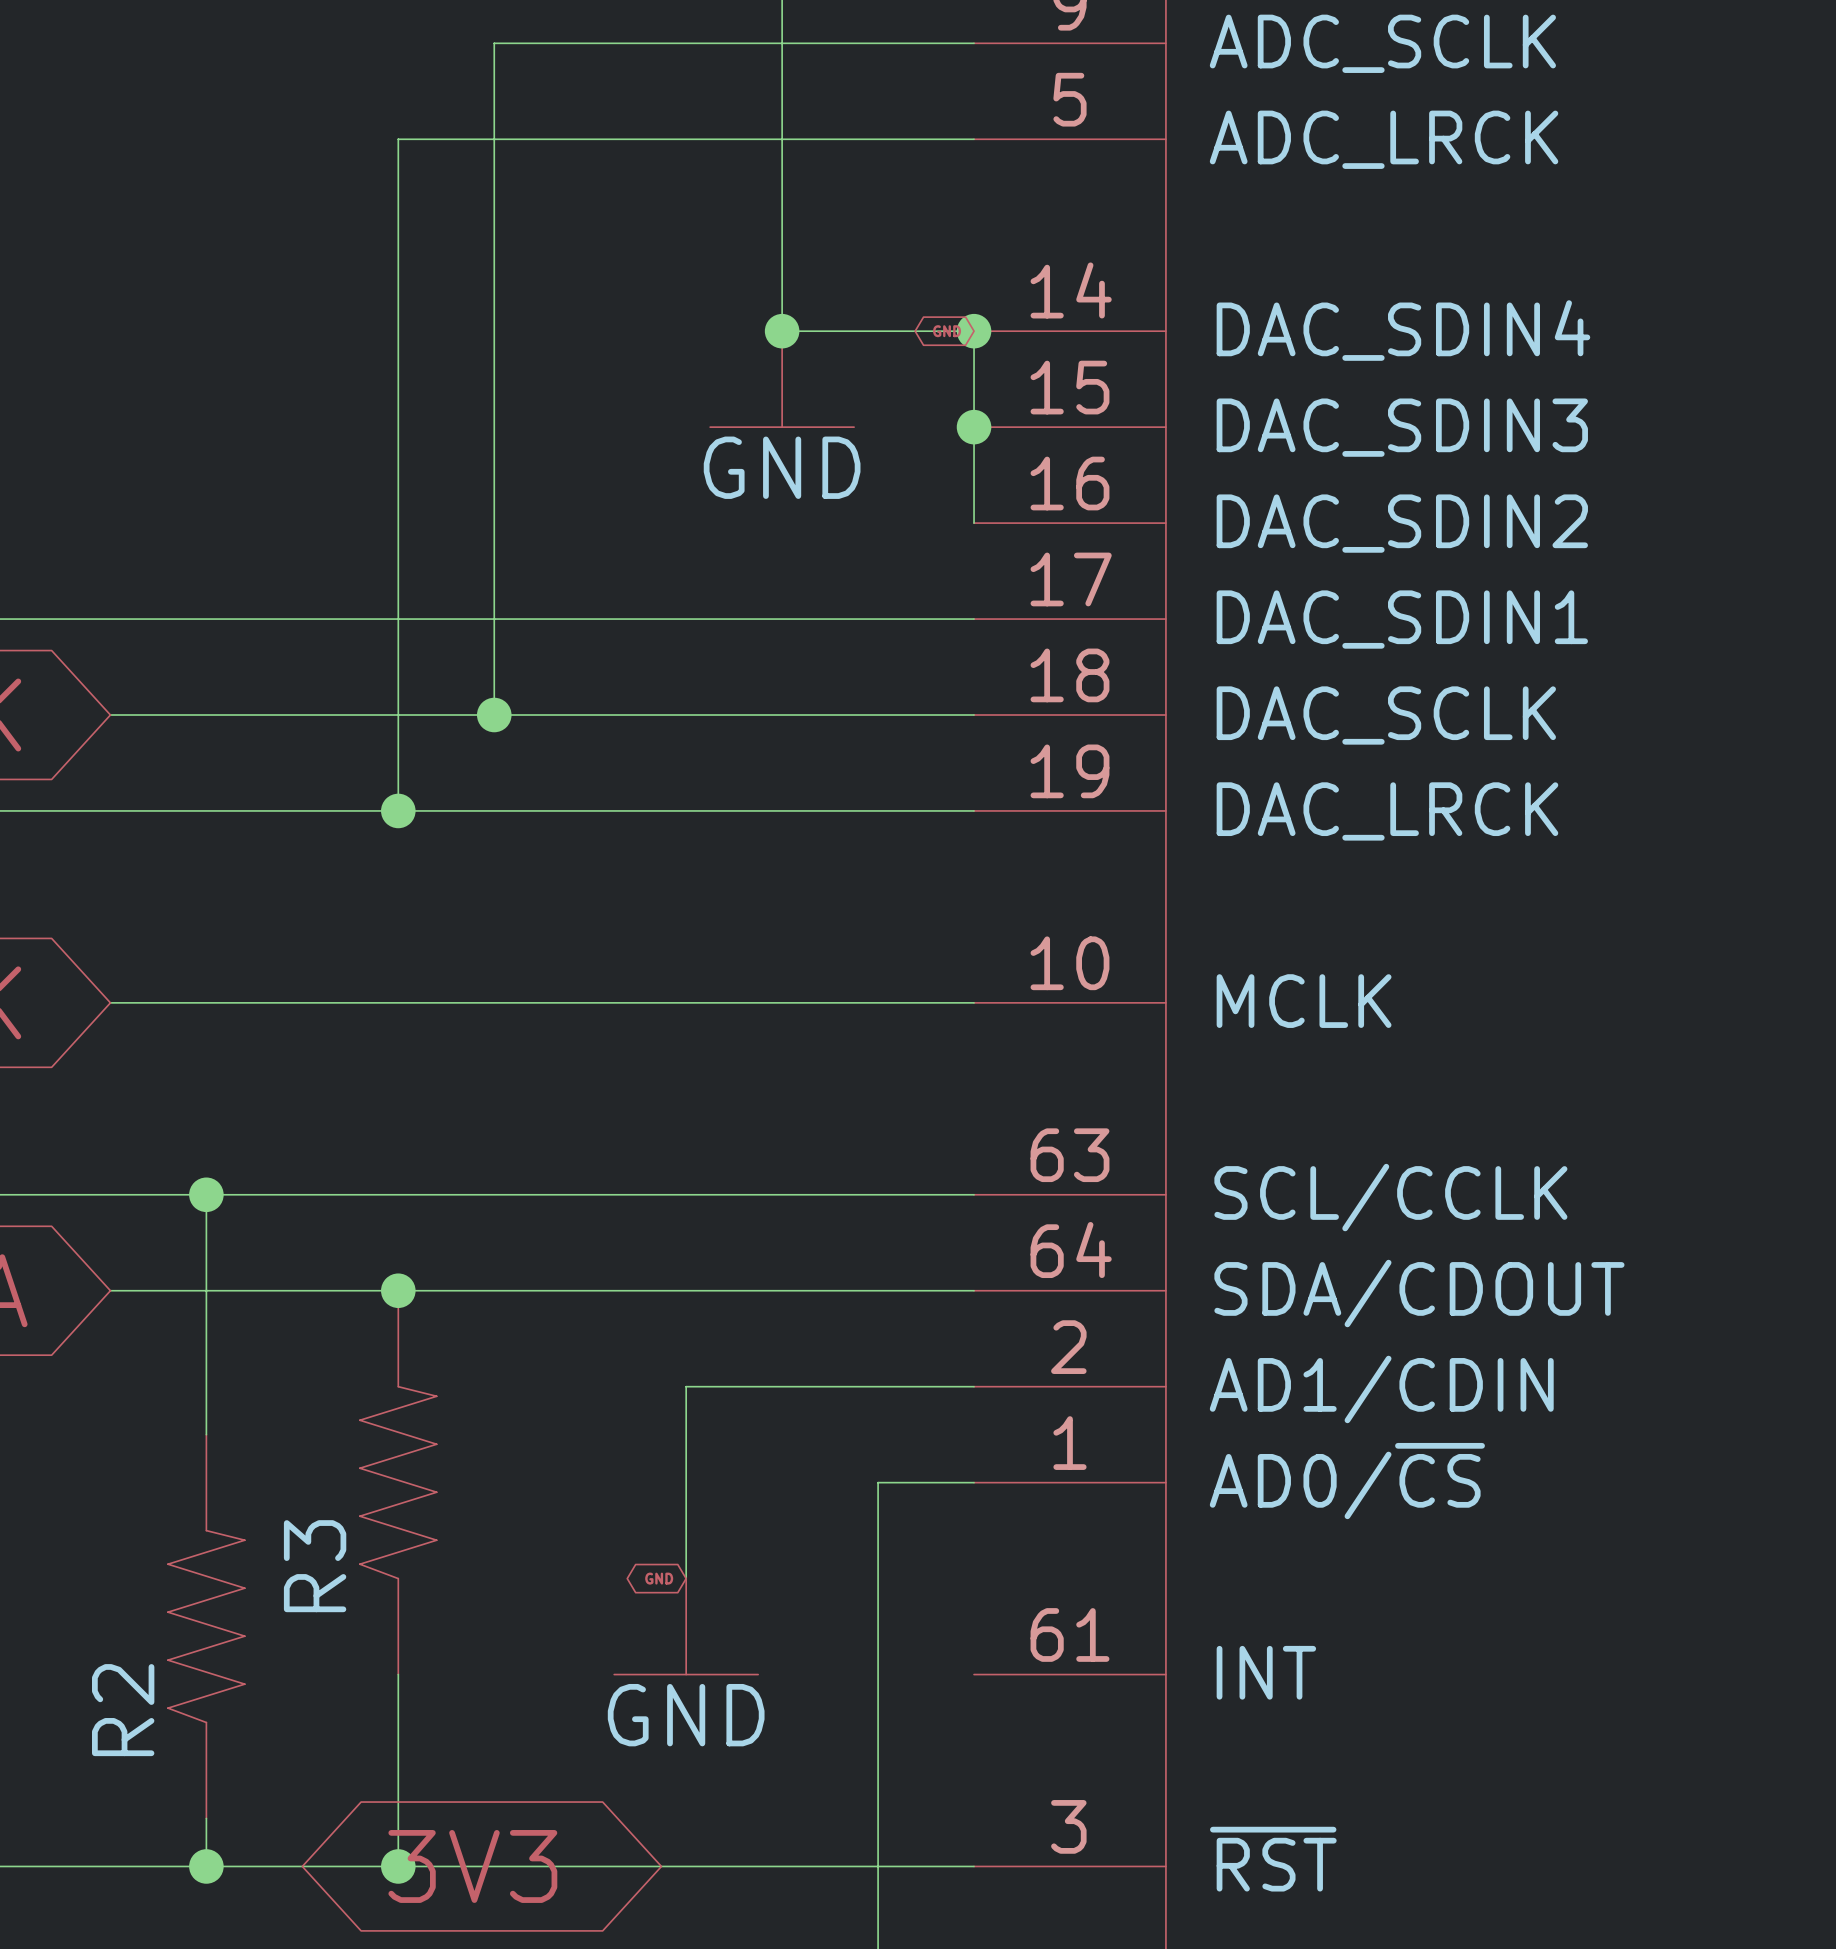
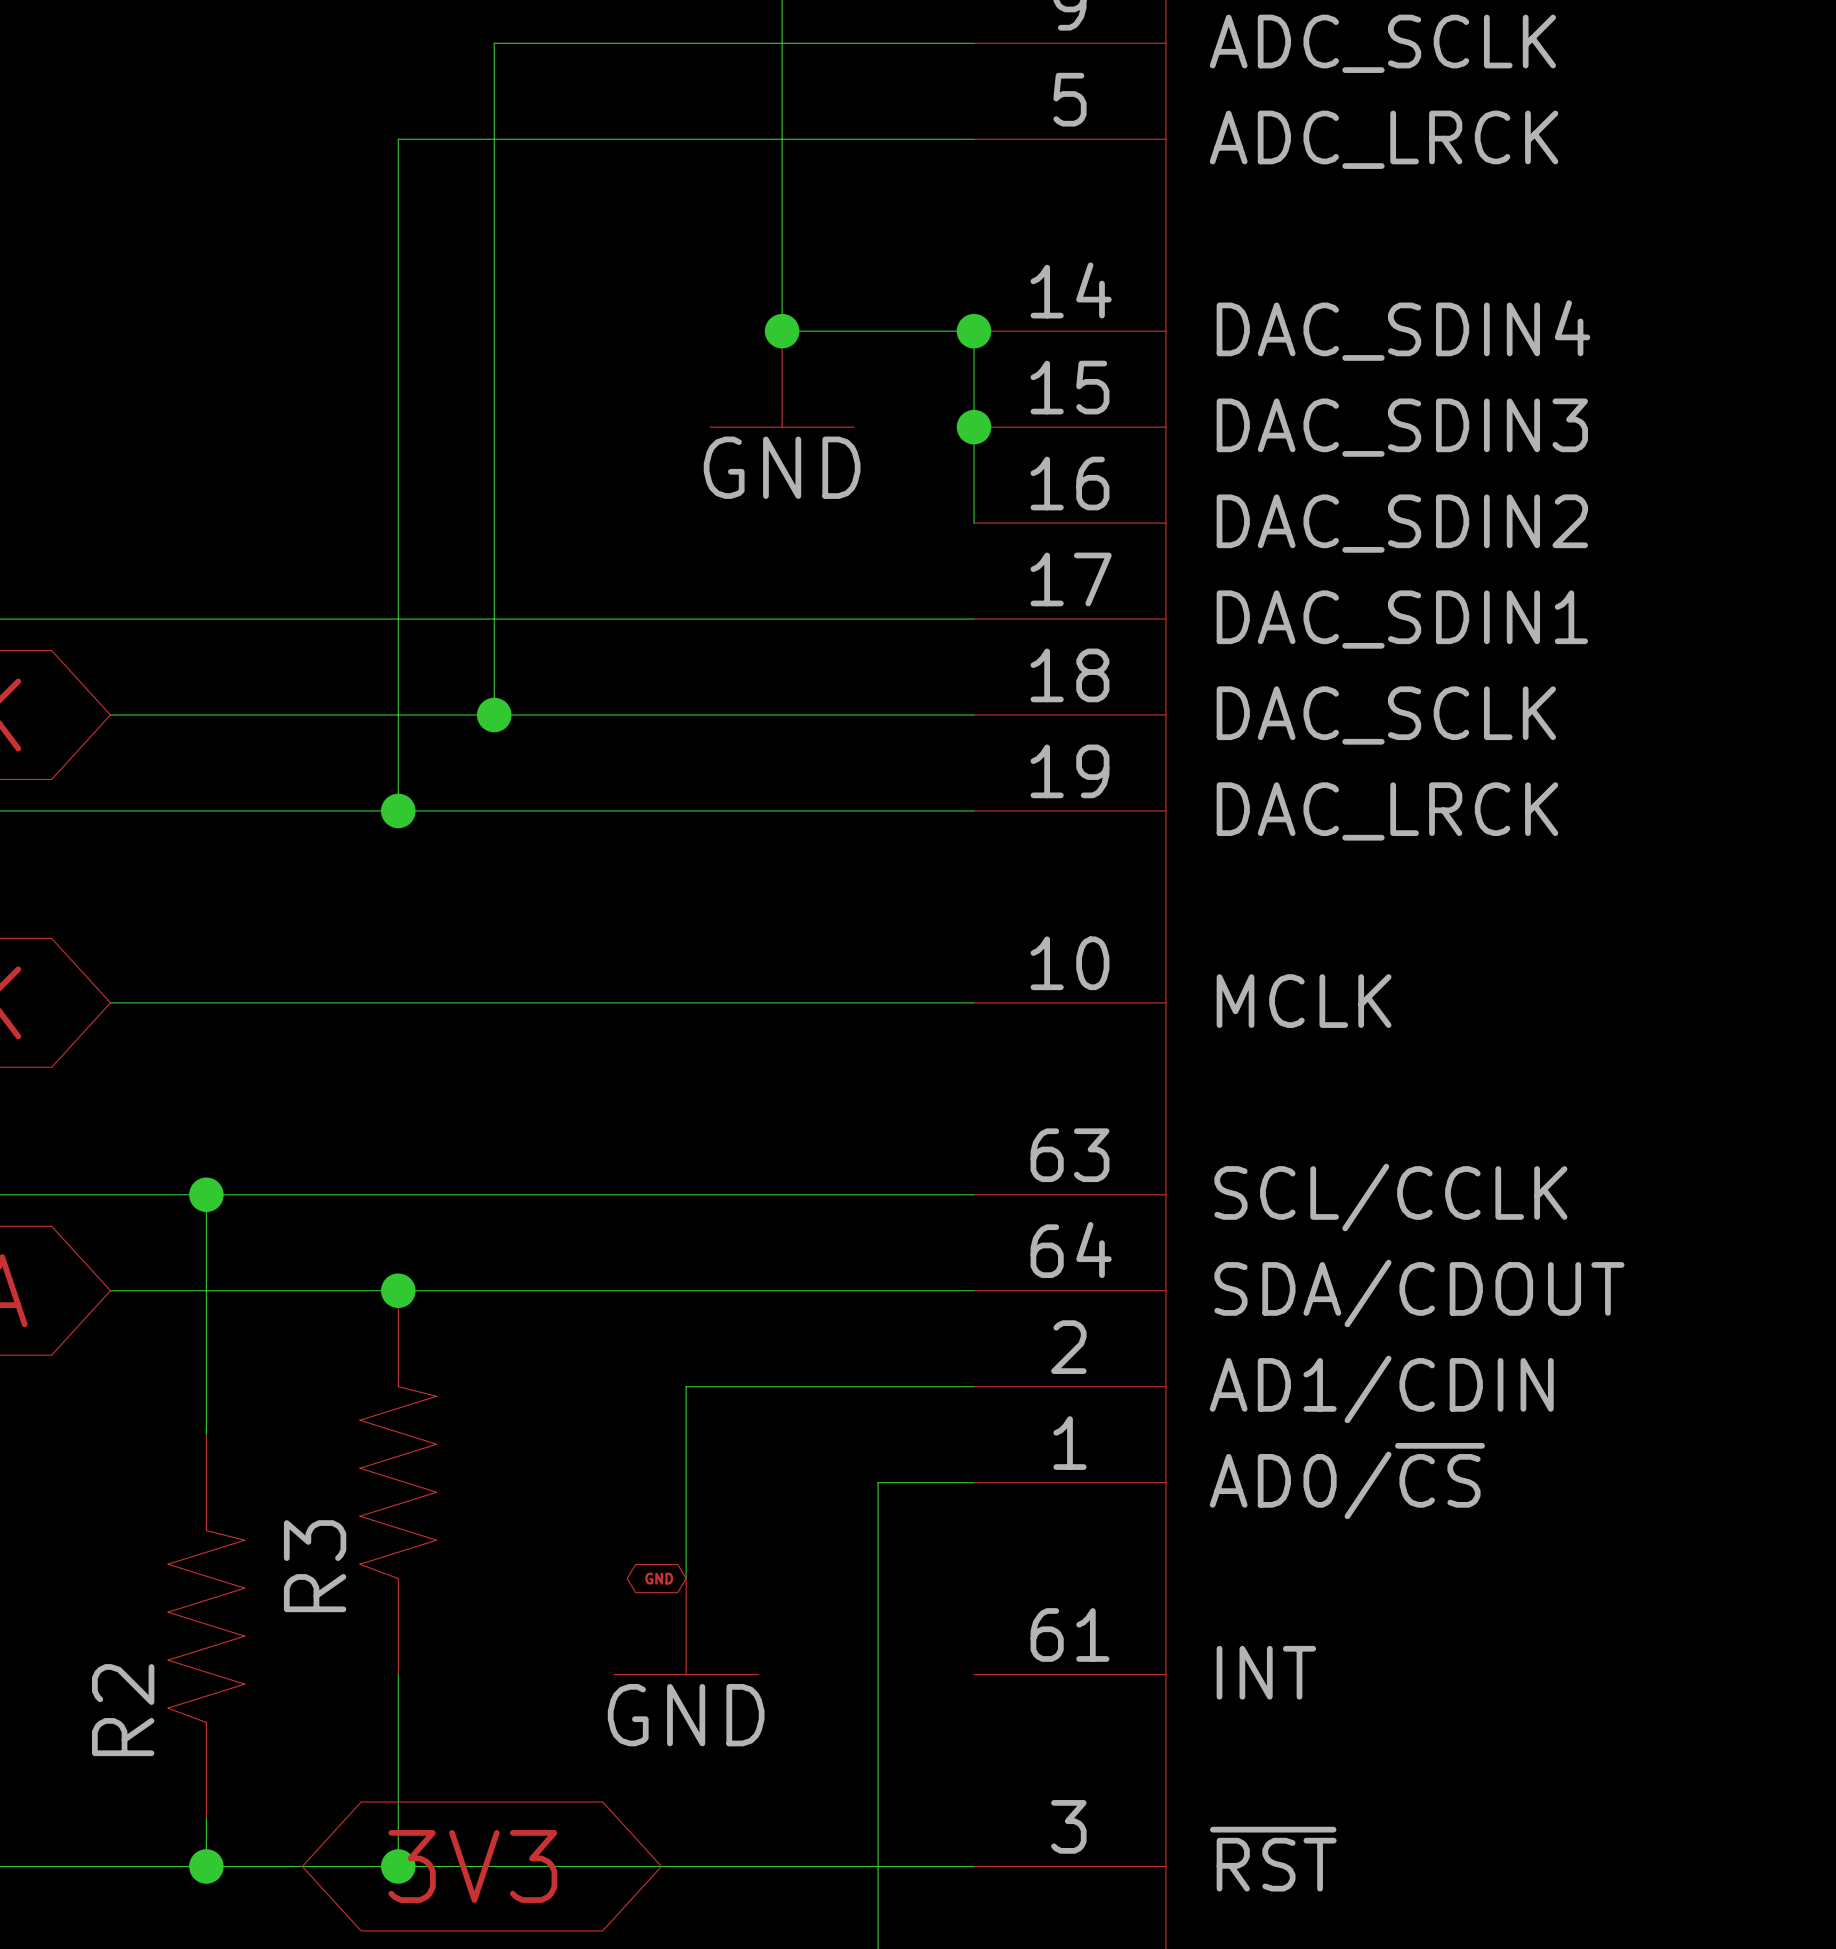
global label: GND (947, 331) -> none

